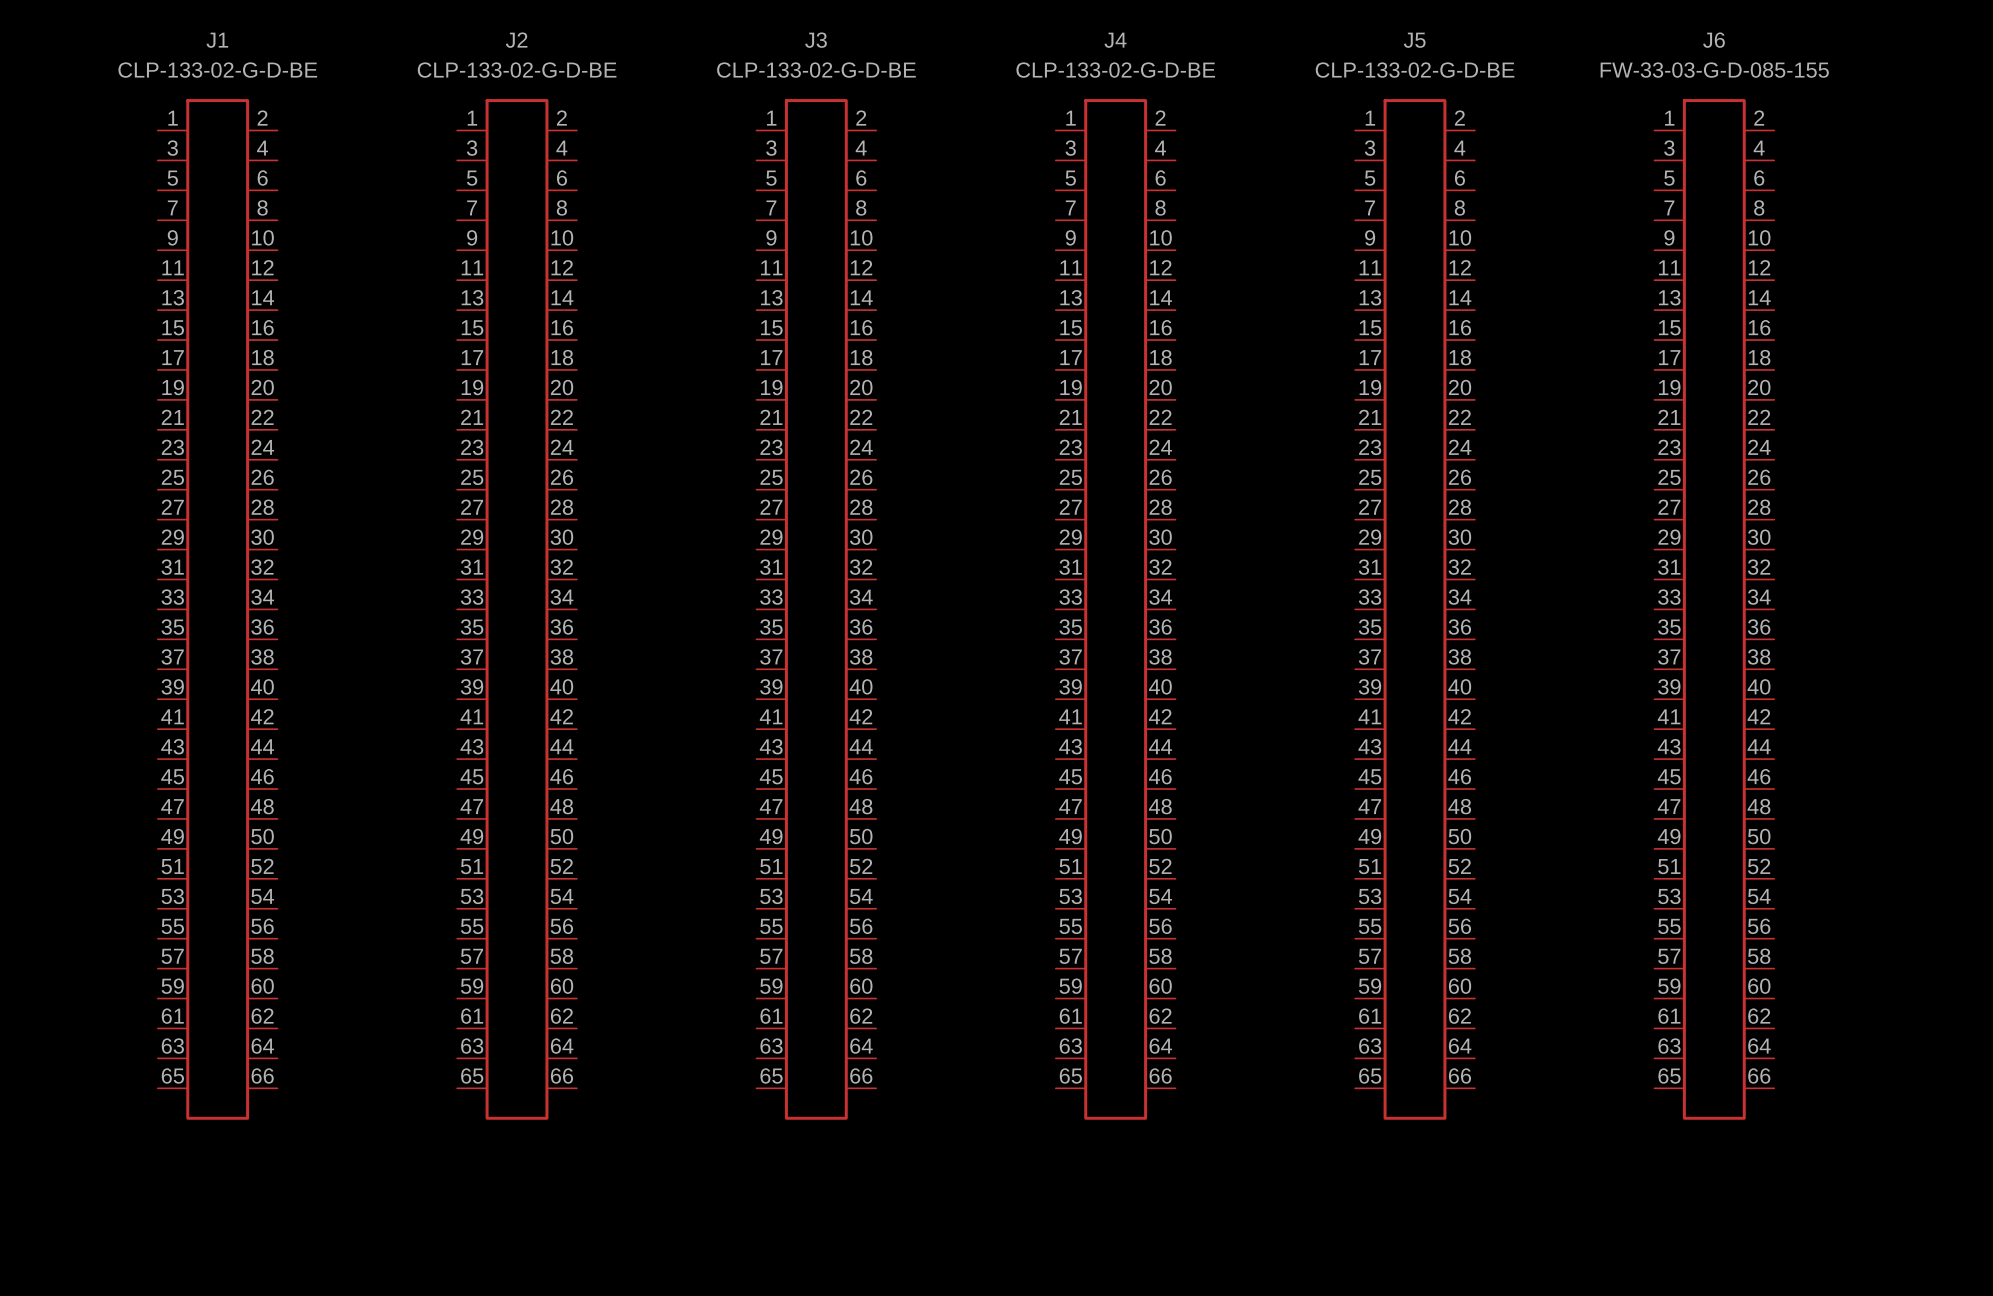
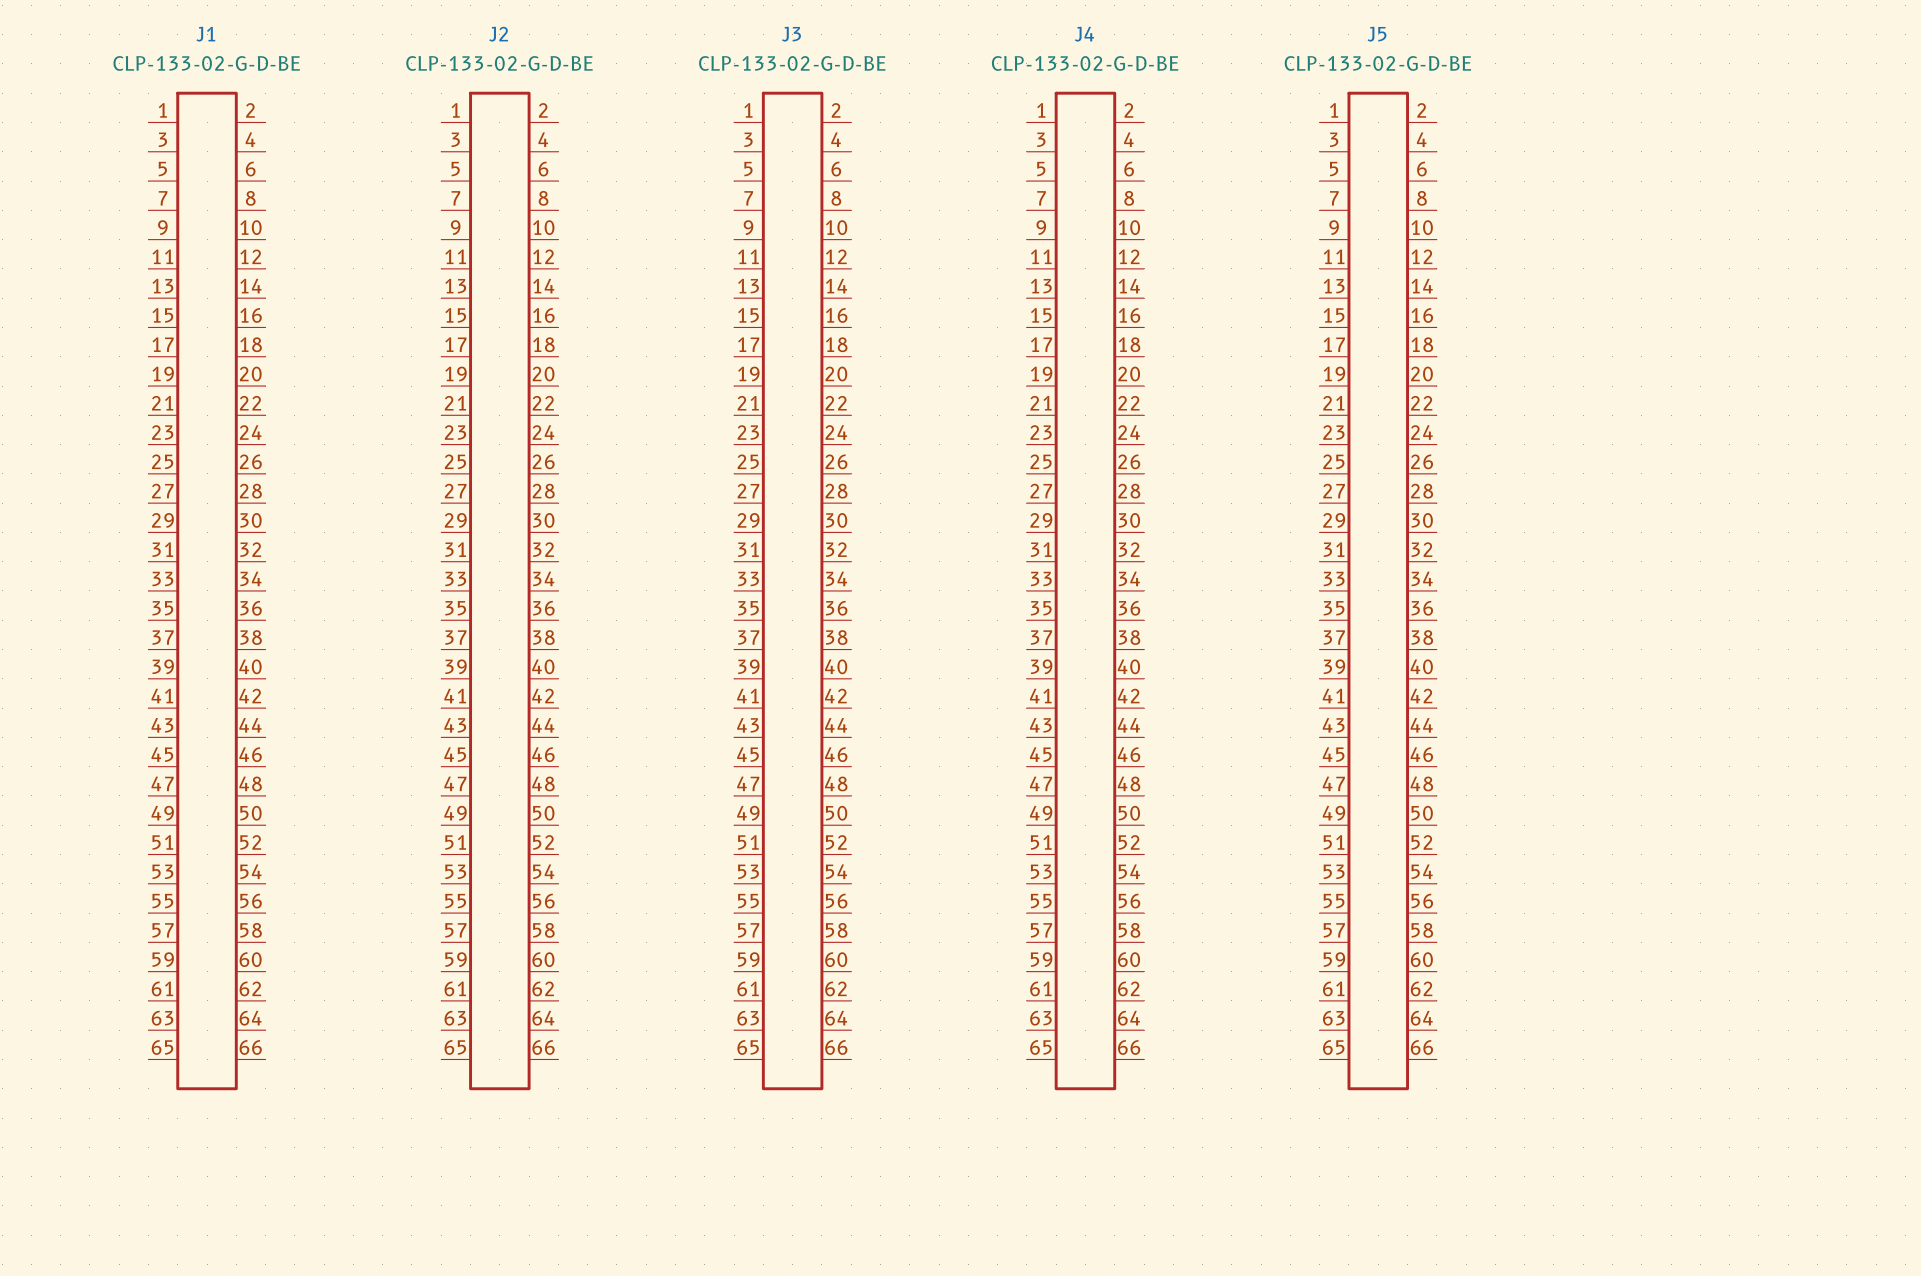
J6: FW-33-03-G-D-085-155 (1714, 609) -> none

